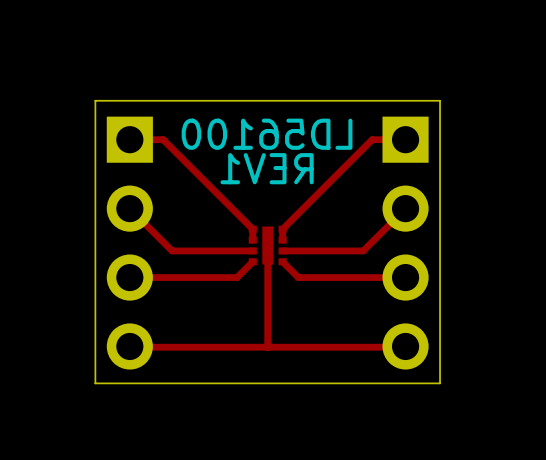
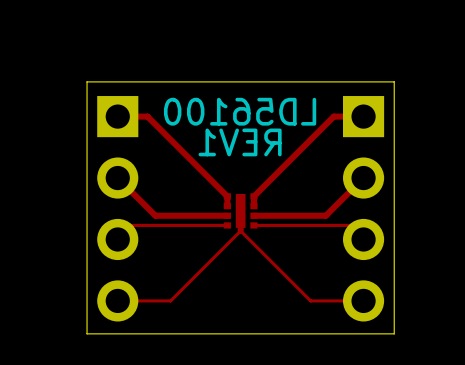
top track: (252, 261) (237, 277) (129, 277) -> (227, 225) (131, 225) (117, 239)
top track: (282, 261) (298, 277) (405, 277) -> (253, 225) (349, 225) (363, 239)
top track: (267, 267) (267, 347) -> none
top track: (405, 346) (129, 346) -> (363, 300) (310, 300) (240, 230) (170, 300) (117, 300)

